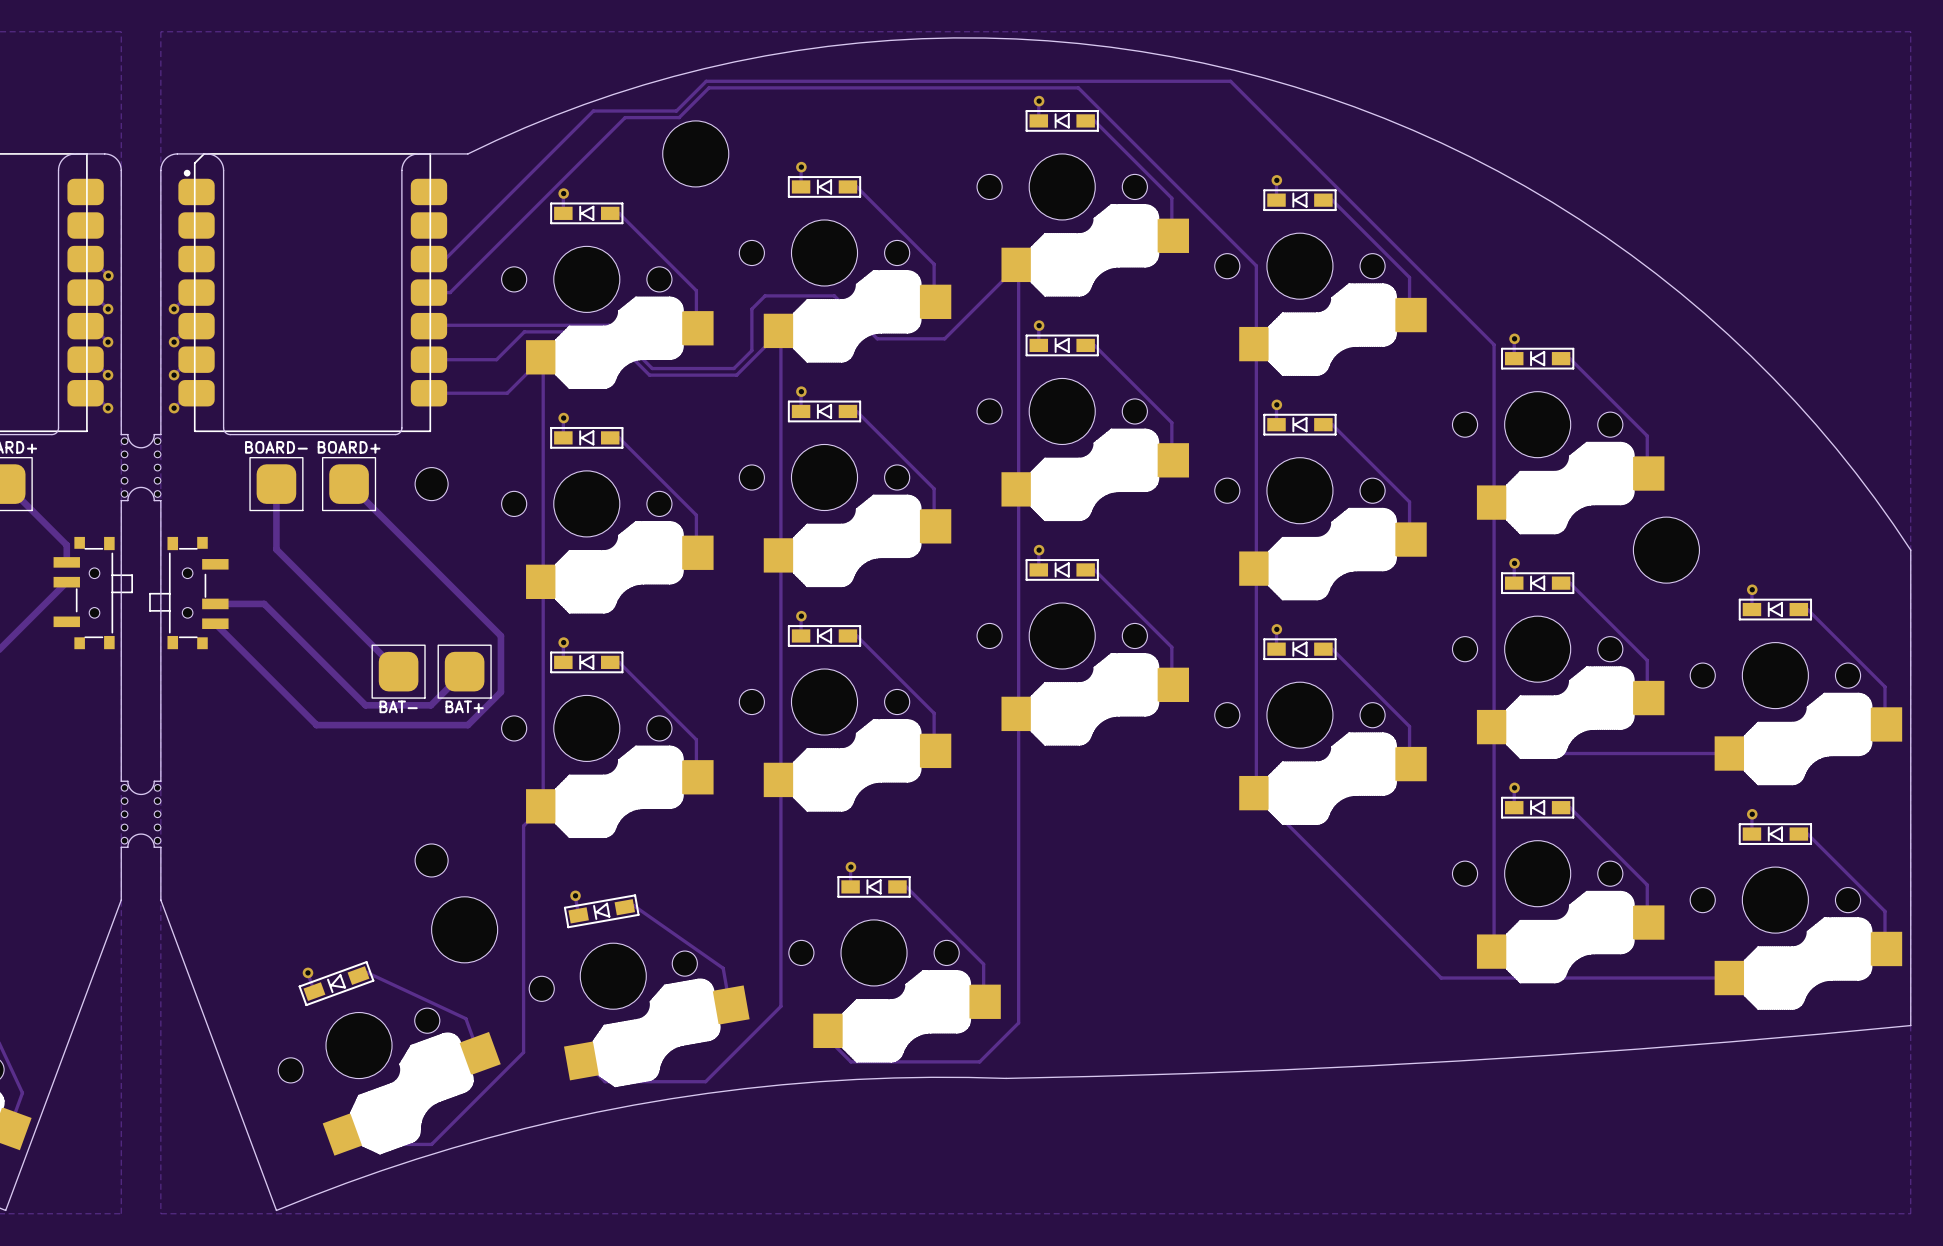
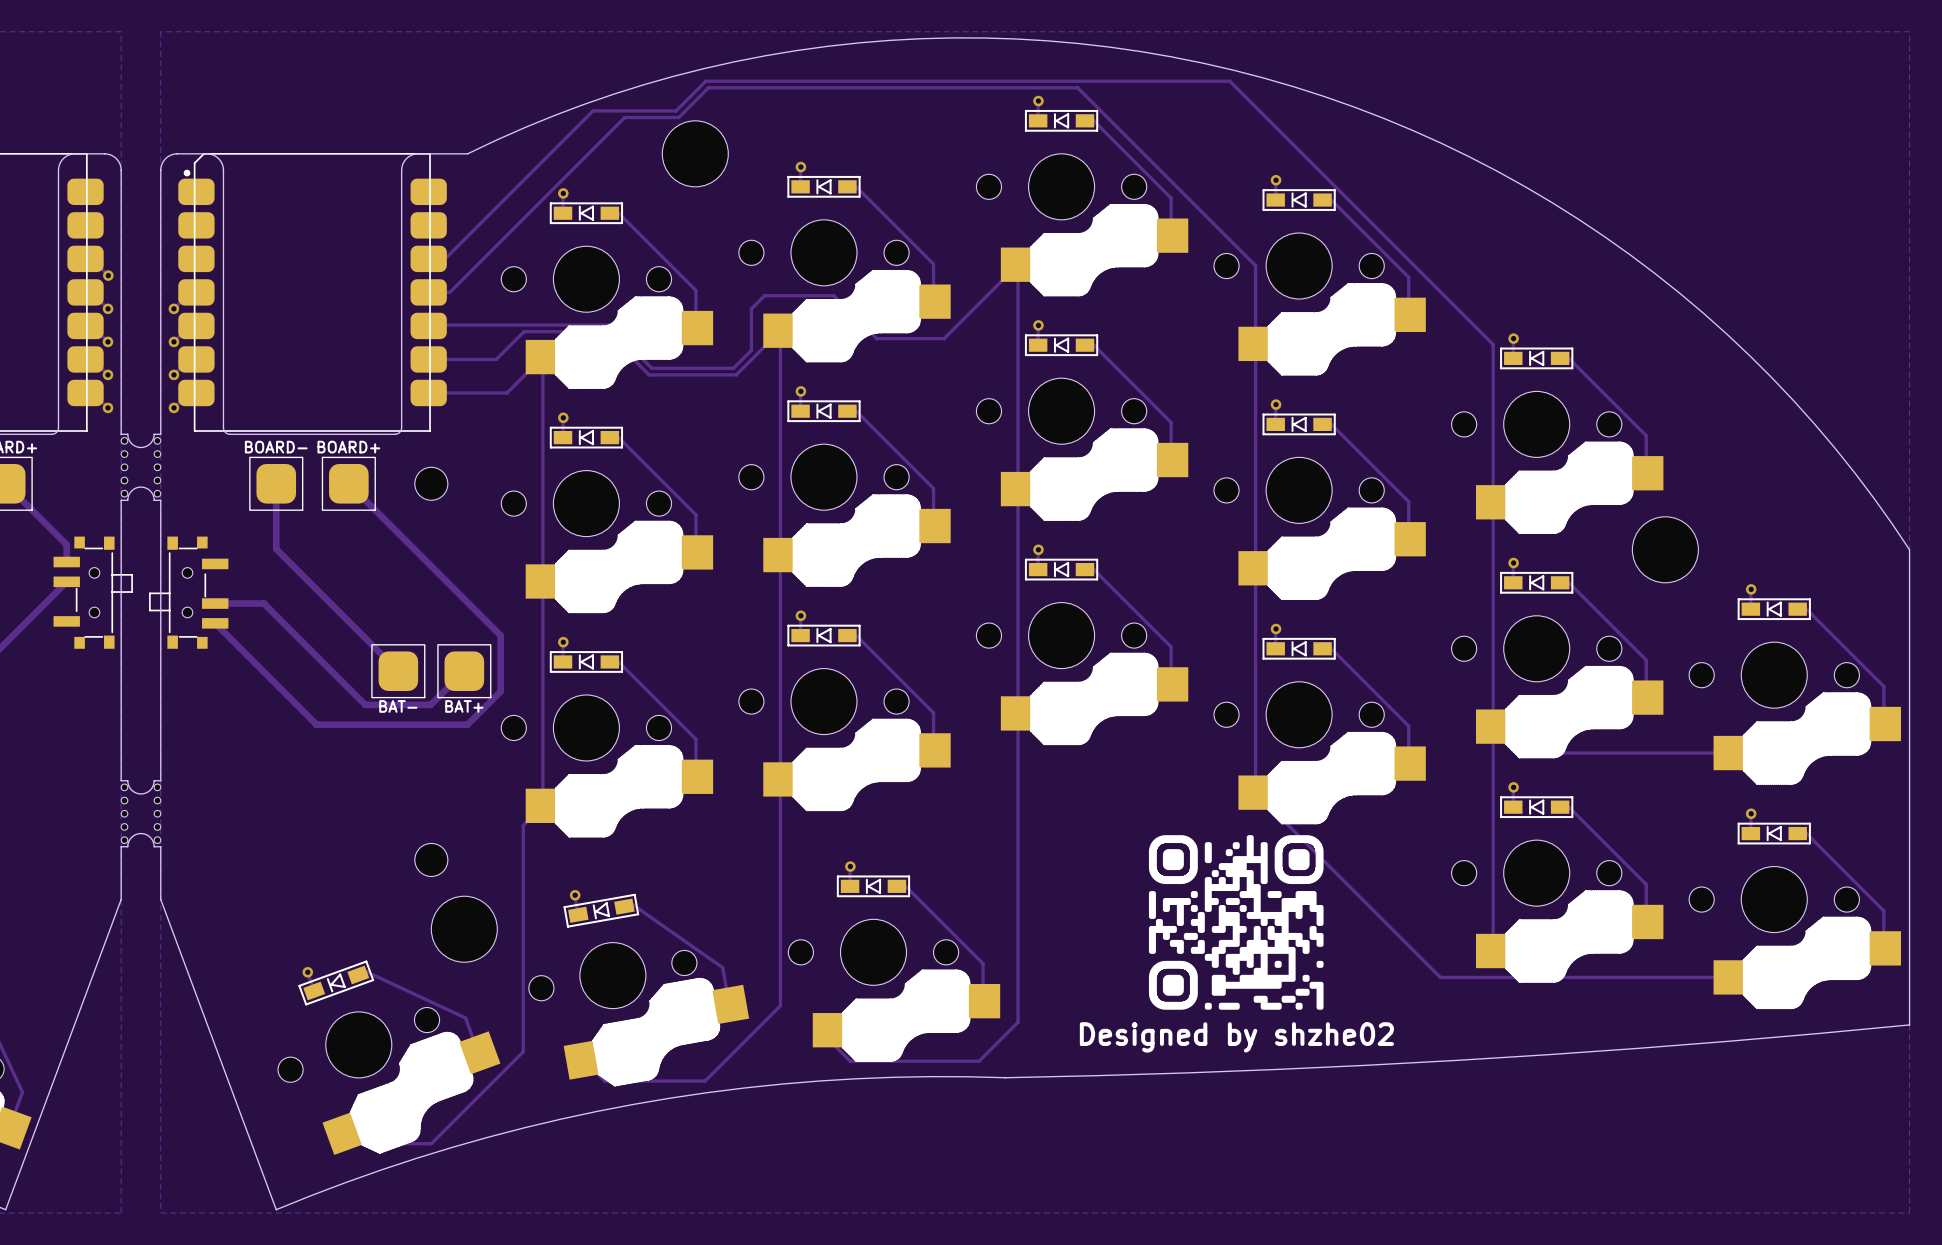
drawing: none -> [1148, 835, 1324, 1010]
line: none -> (1182, 842) (1187, 844) (1190, 849) (1188, 872) (1182, 876) (1160, 875) (1156, 868) (1157, 846) (1164, 842) (1182, 842)
line: none -> (1308, 842) (1289, 842) (1283, 846) (1282, 868) (1286, 875) (1307, 876) (1314, 872) (1316, 849) (1313, 844) (1308, 842)
line: none -> (1181, 968) (1163, 968) (1157, 972) (1156, 994) (1160, 1000) (1182, 1002) (1189, 997) (1190, 975) (1187, 970) (1181, 968)
text: none -> Designed by shzhe02 (1236, 1037)

